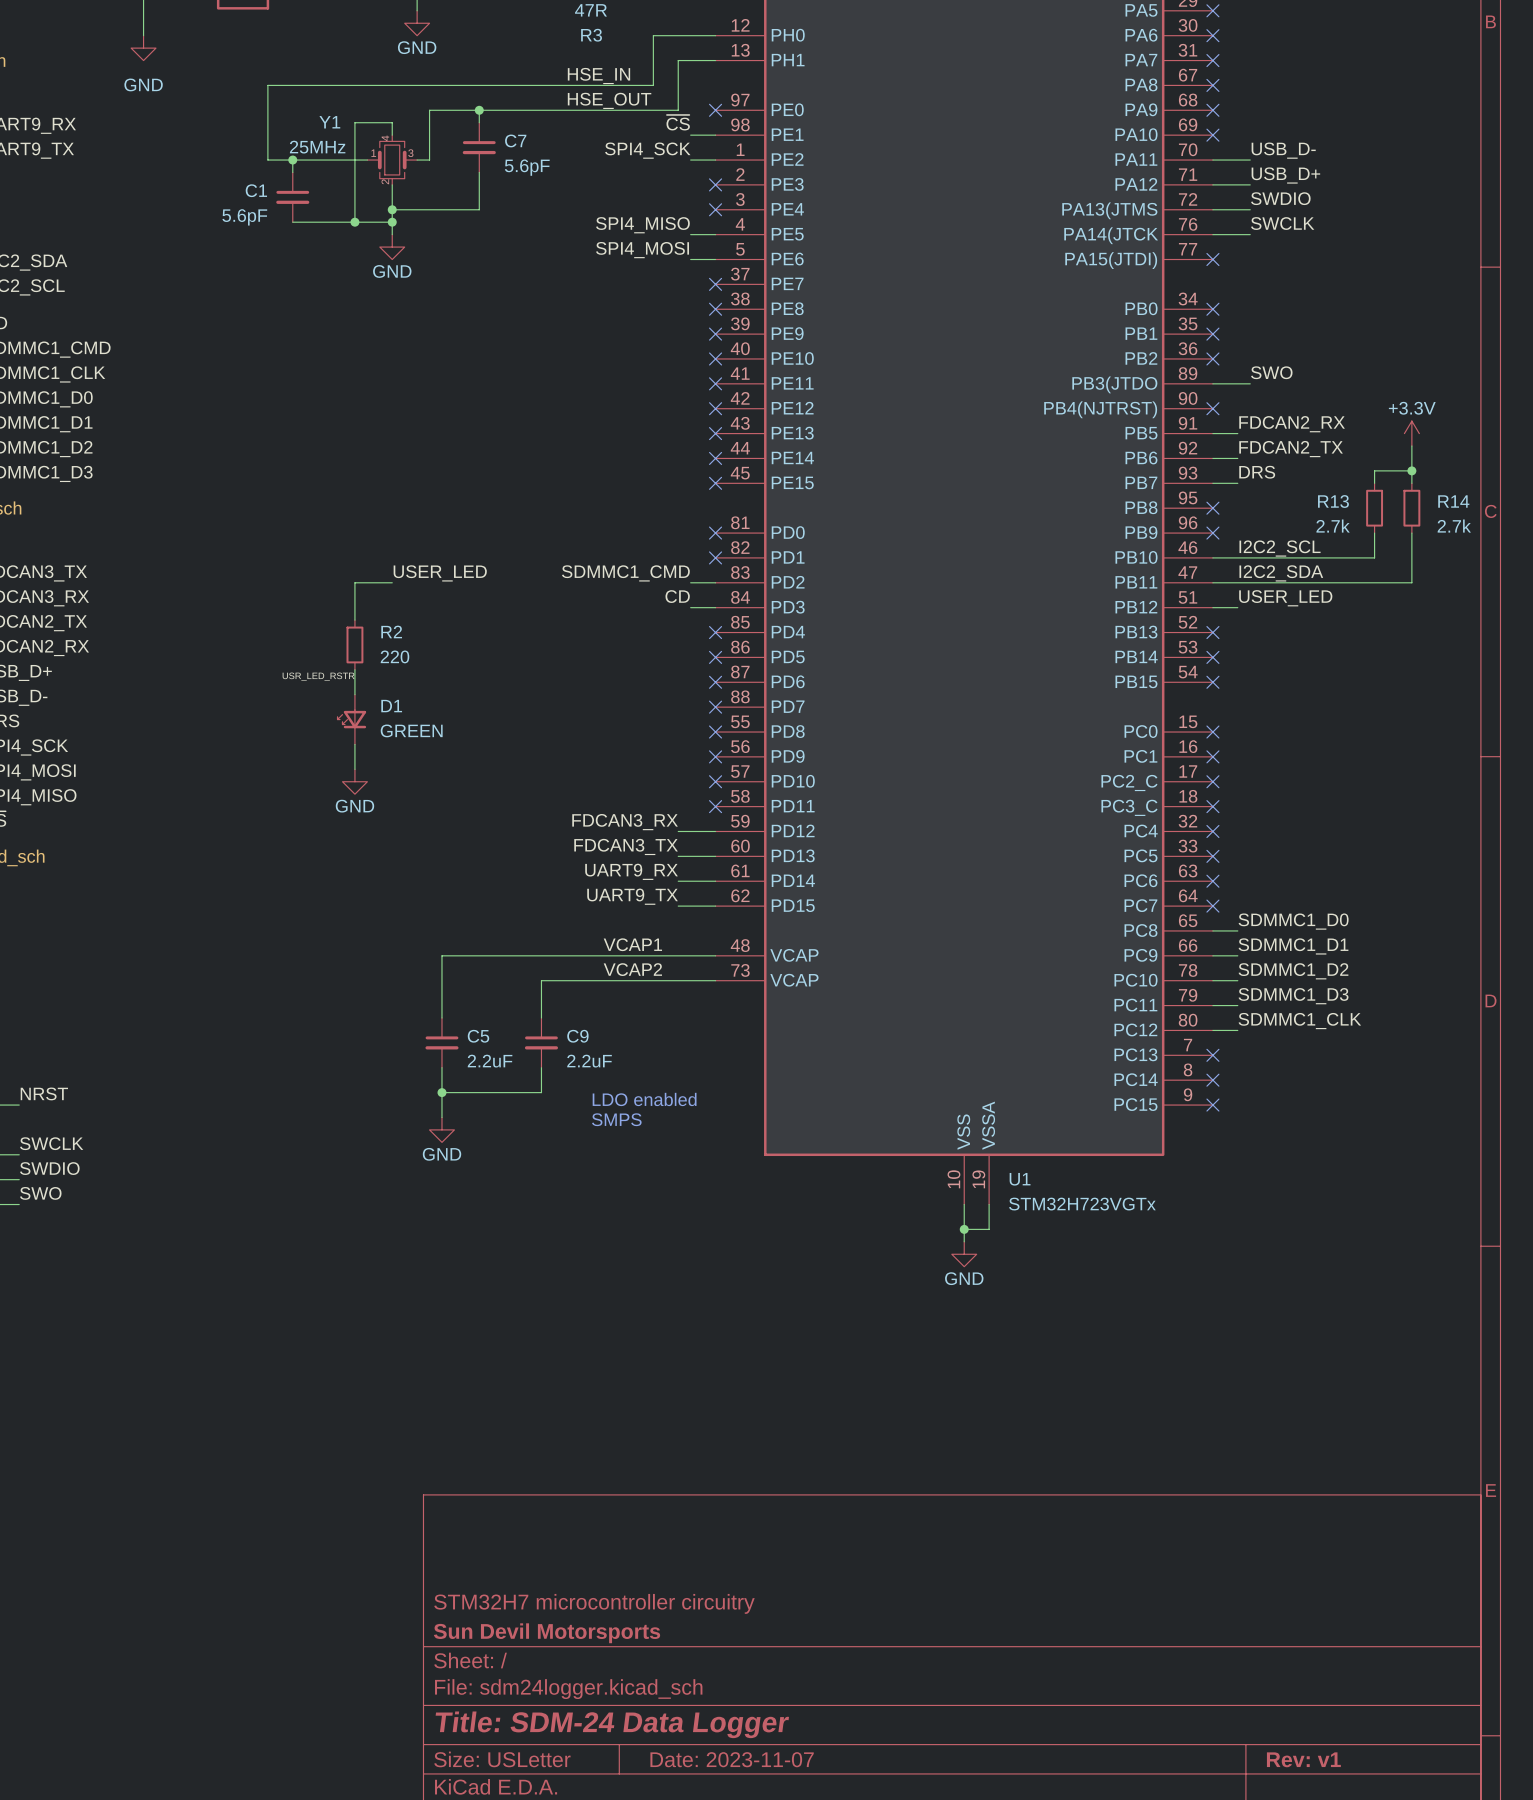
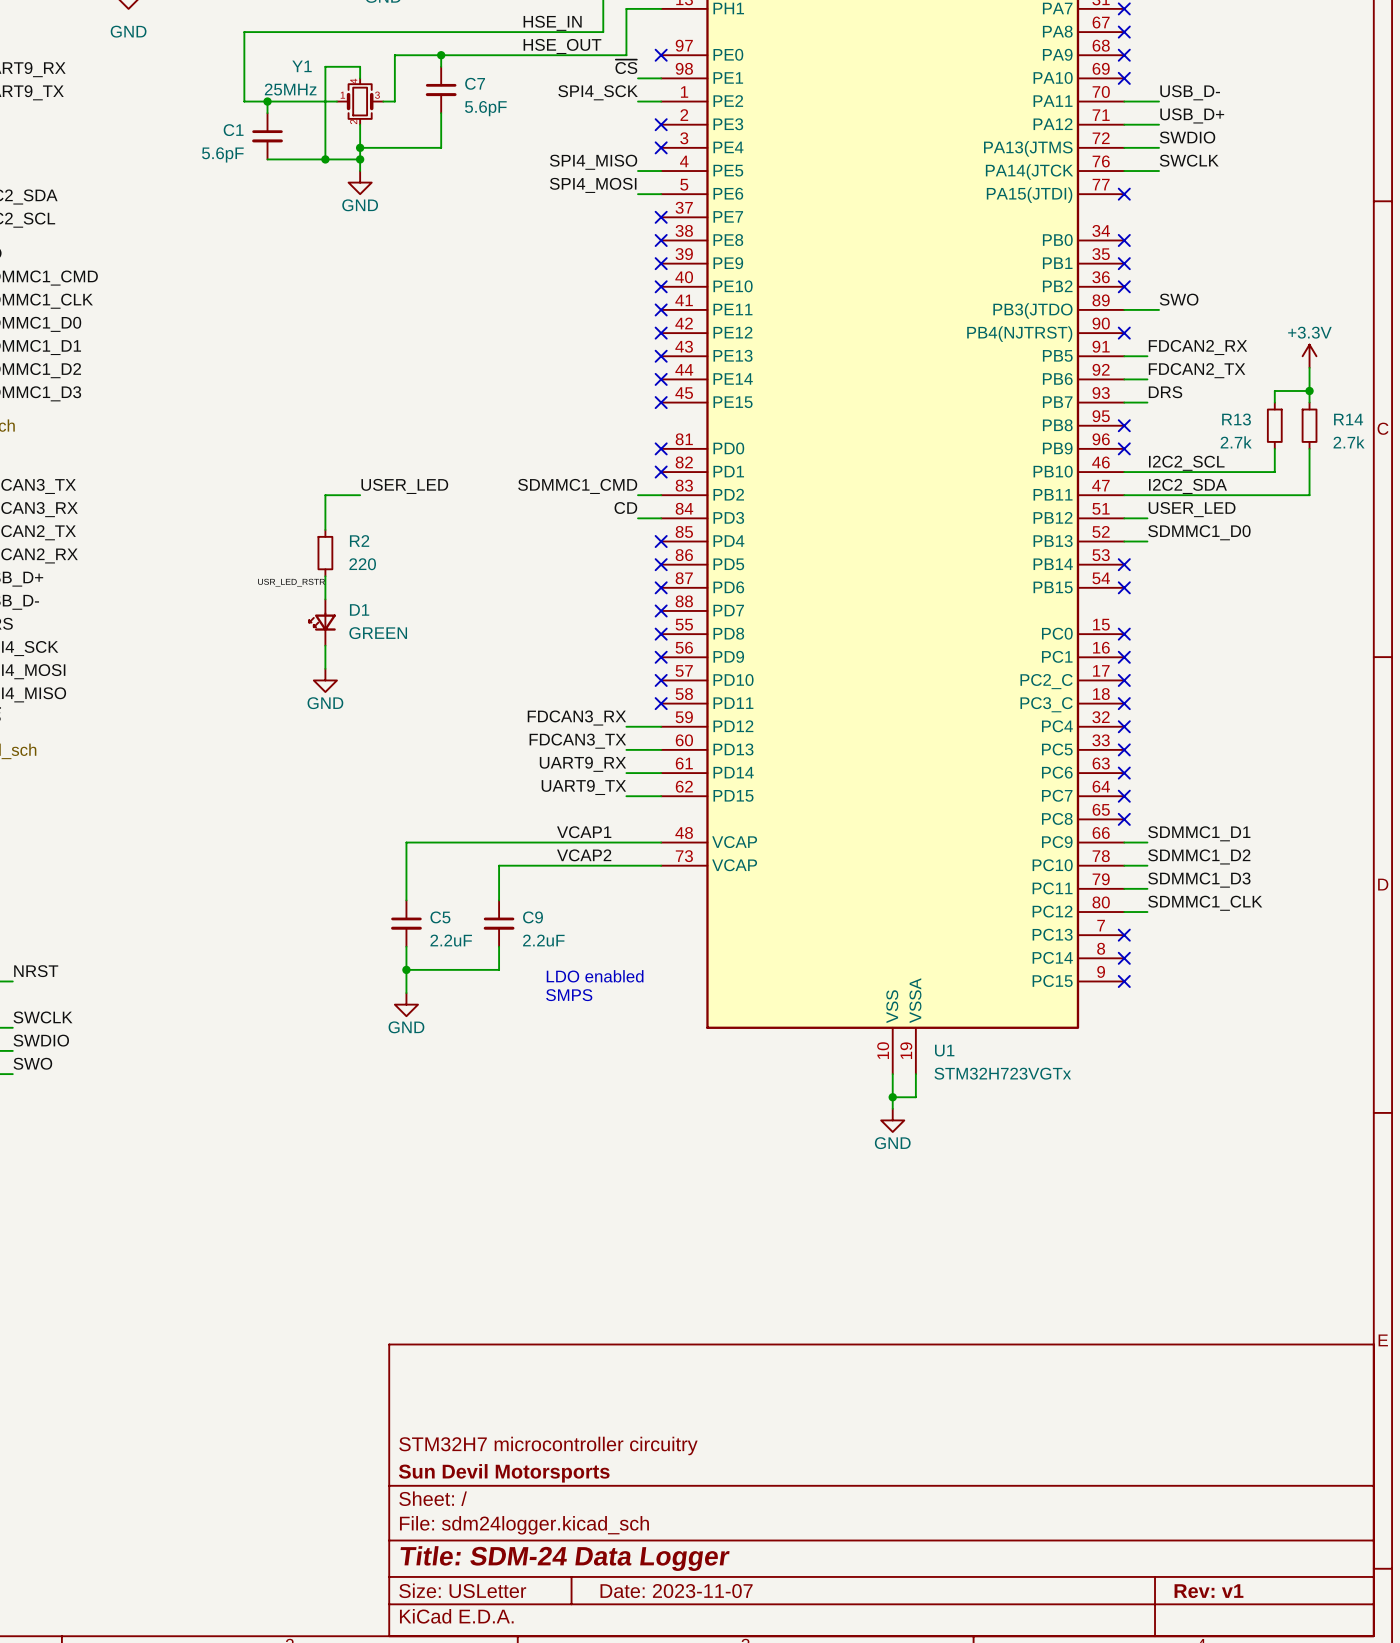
label: none -> SDMMC1_D0 (1199, 532)
wire: none -> (1124, 541) (1147, 541)
no-connect mark: (1212, 632) -> none
label: SDMMC1_D0 (1293, 921) -> none
wire: (1212, 930) (1237, 930) -> none
no-connect mark: none -> (1124, 819)

